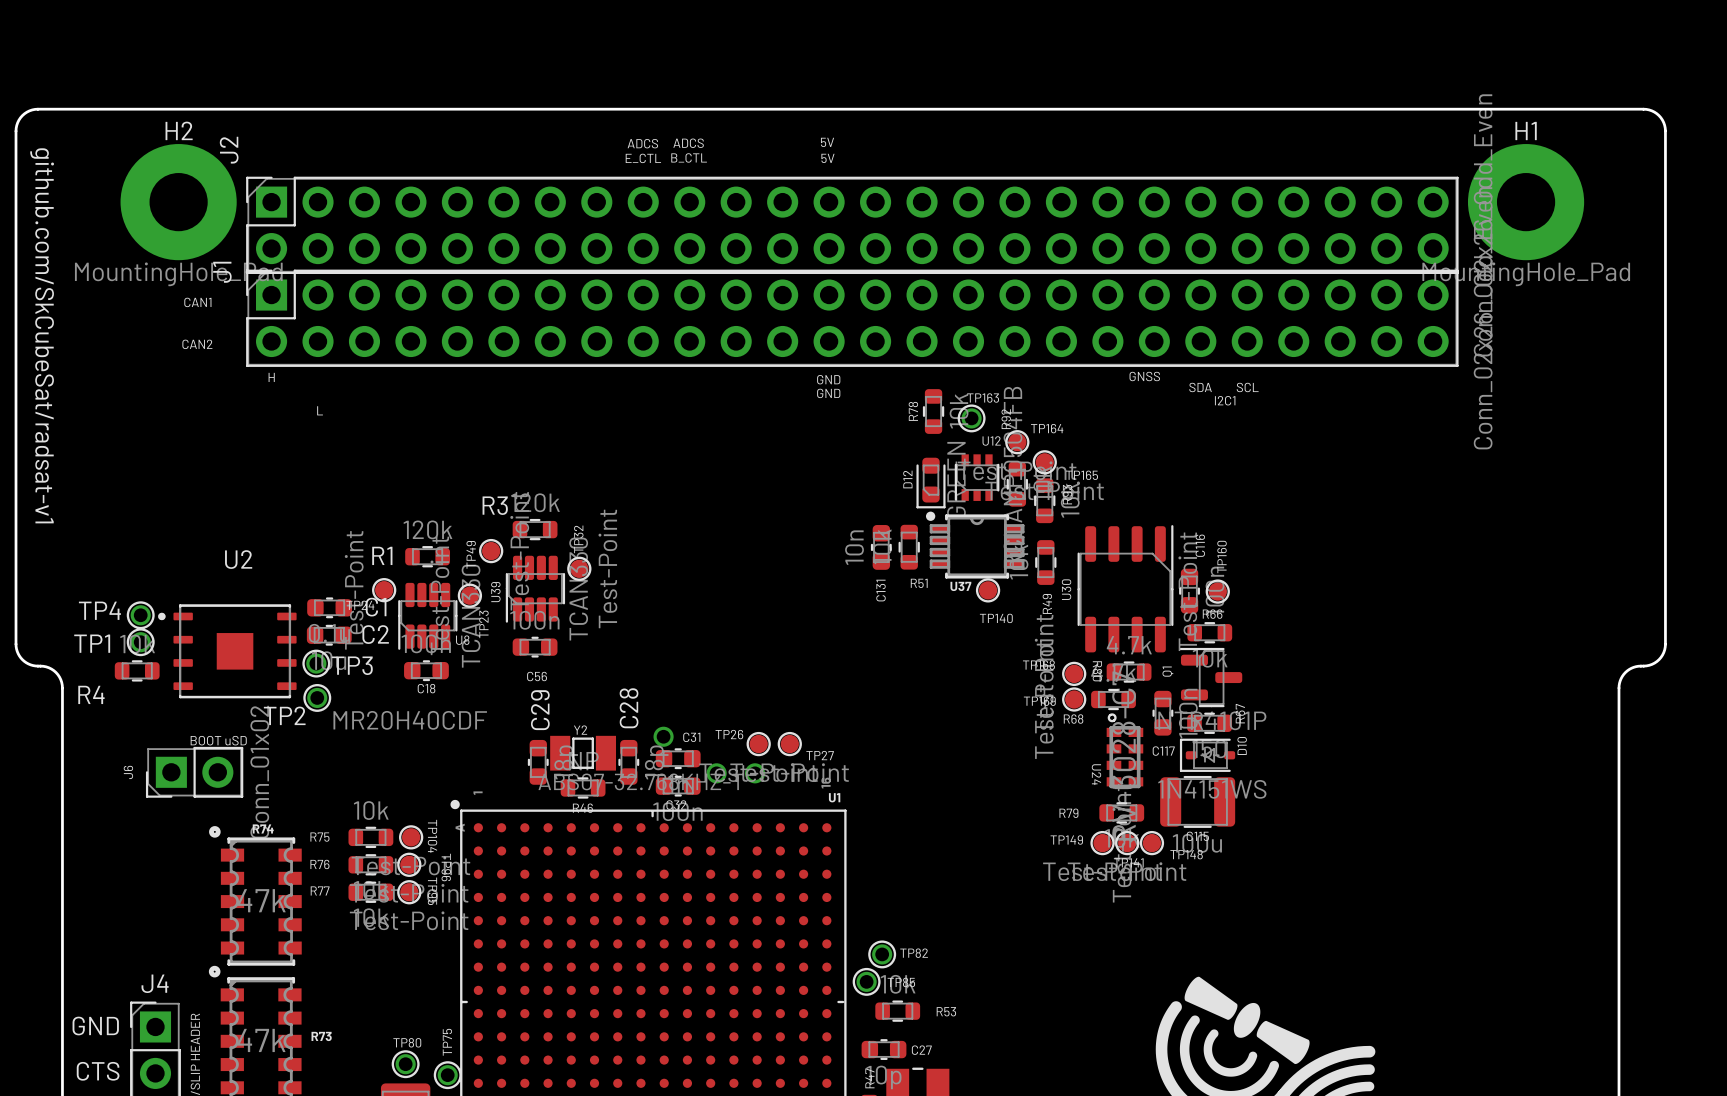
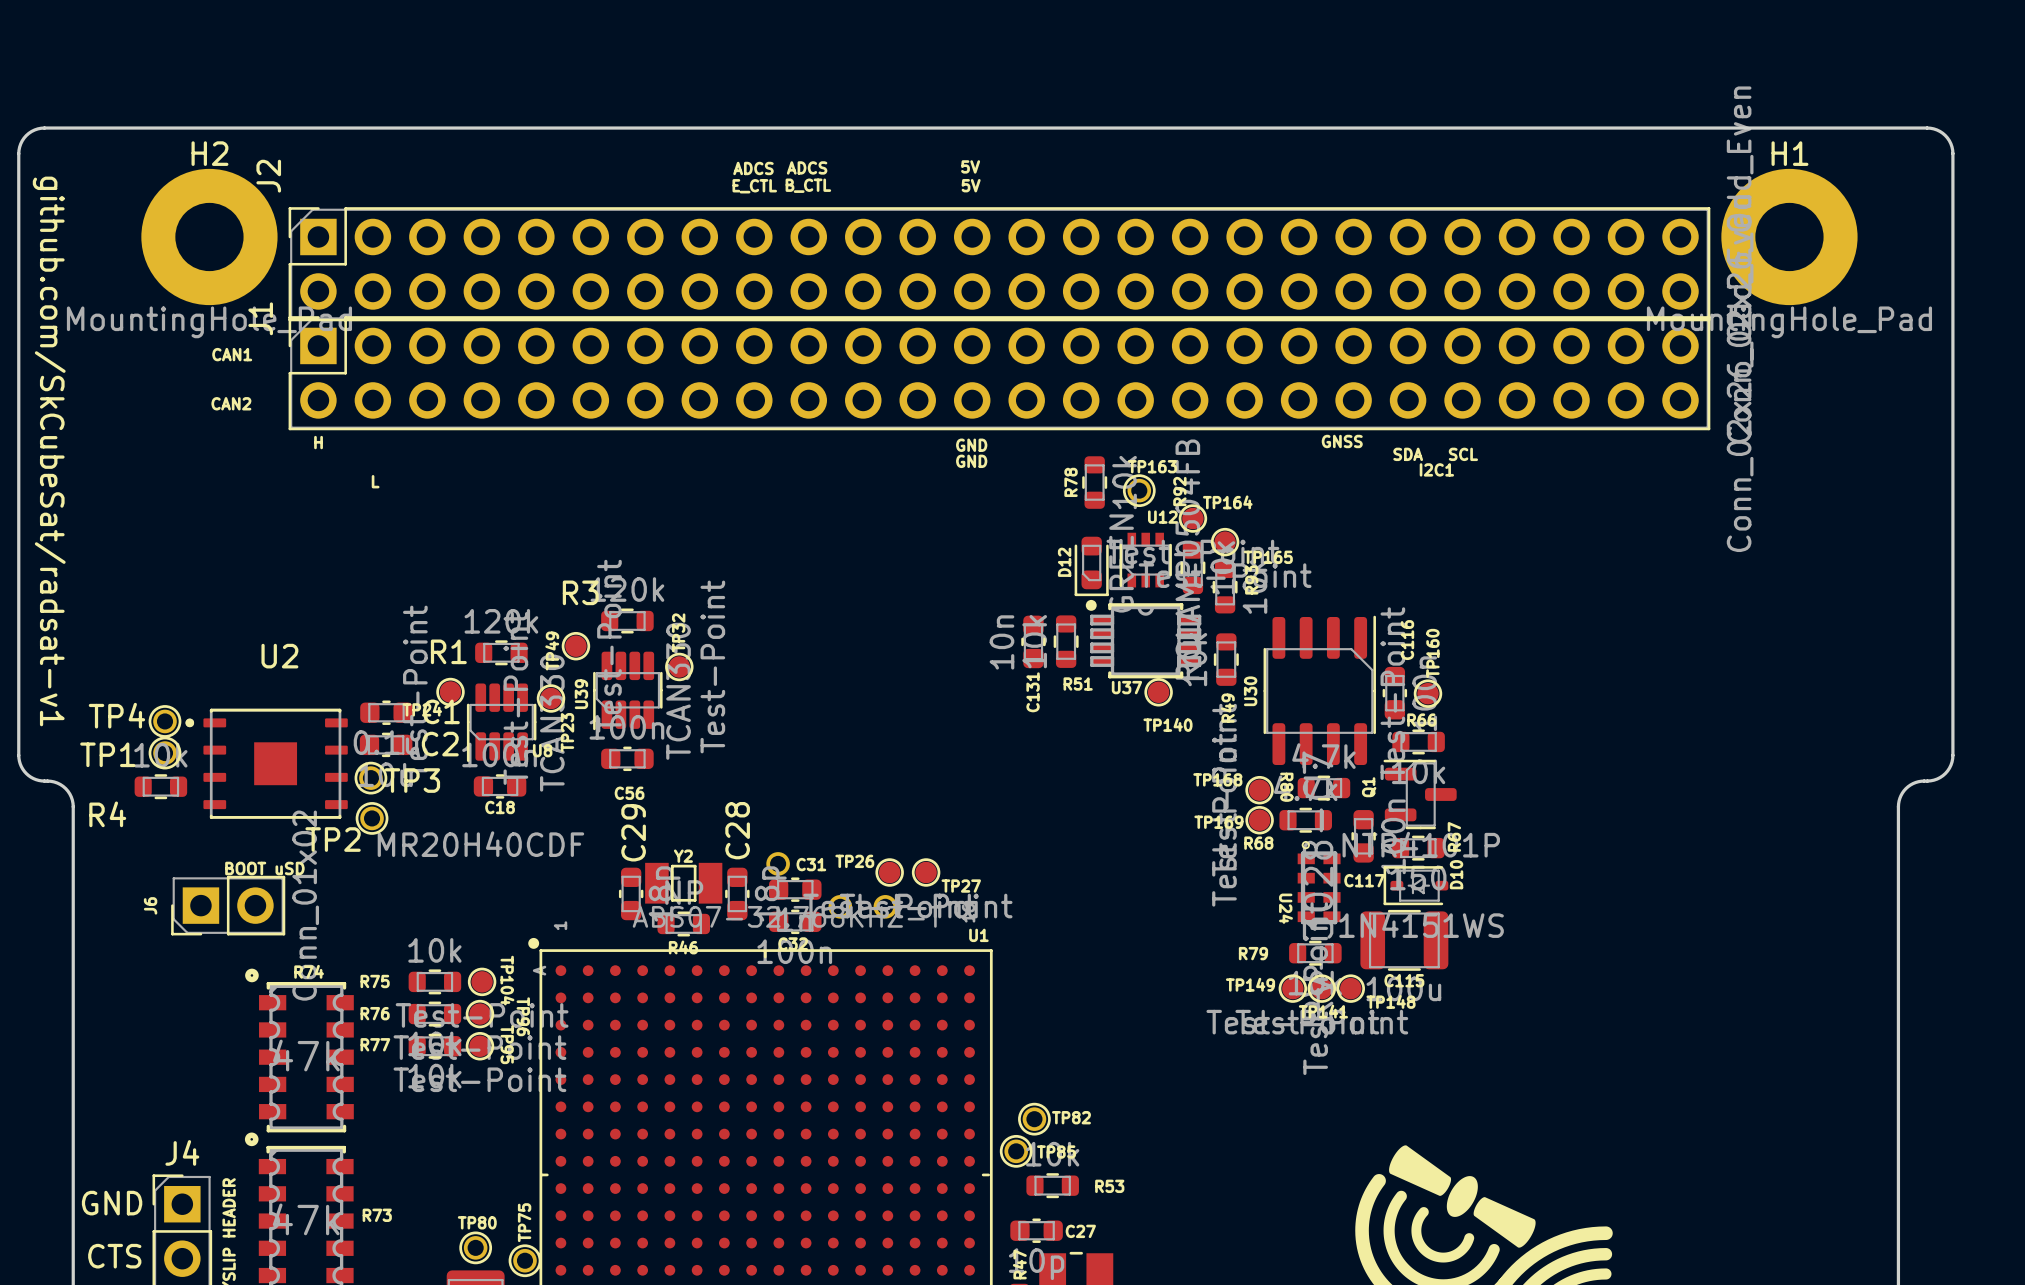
U24 footprint: [1106, 713, 1144, 789] -> [1297, 840, 1341, 925]

